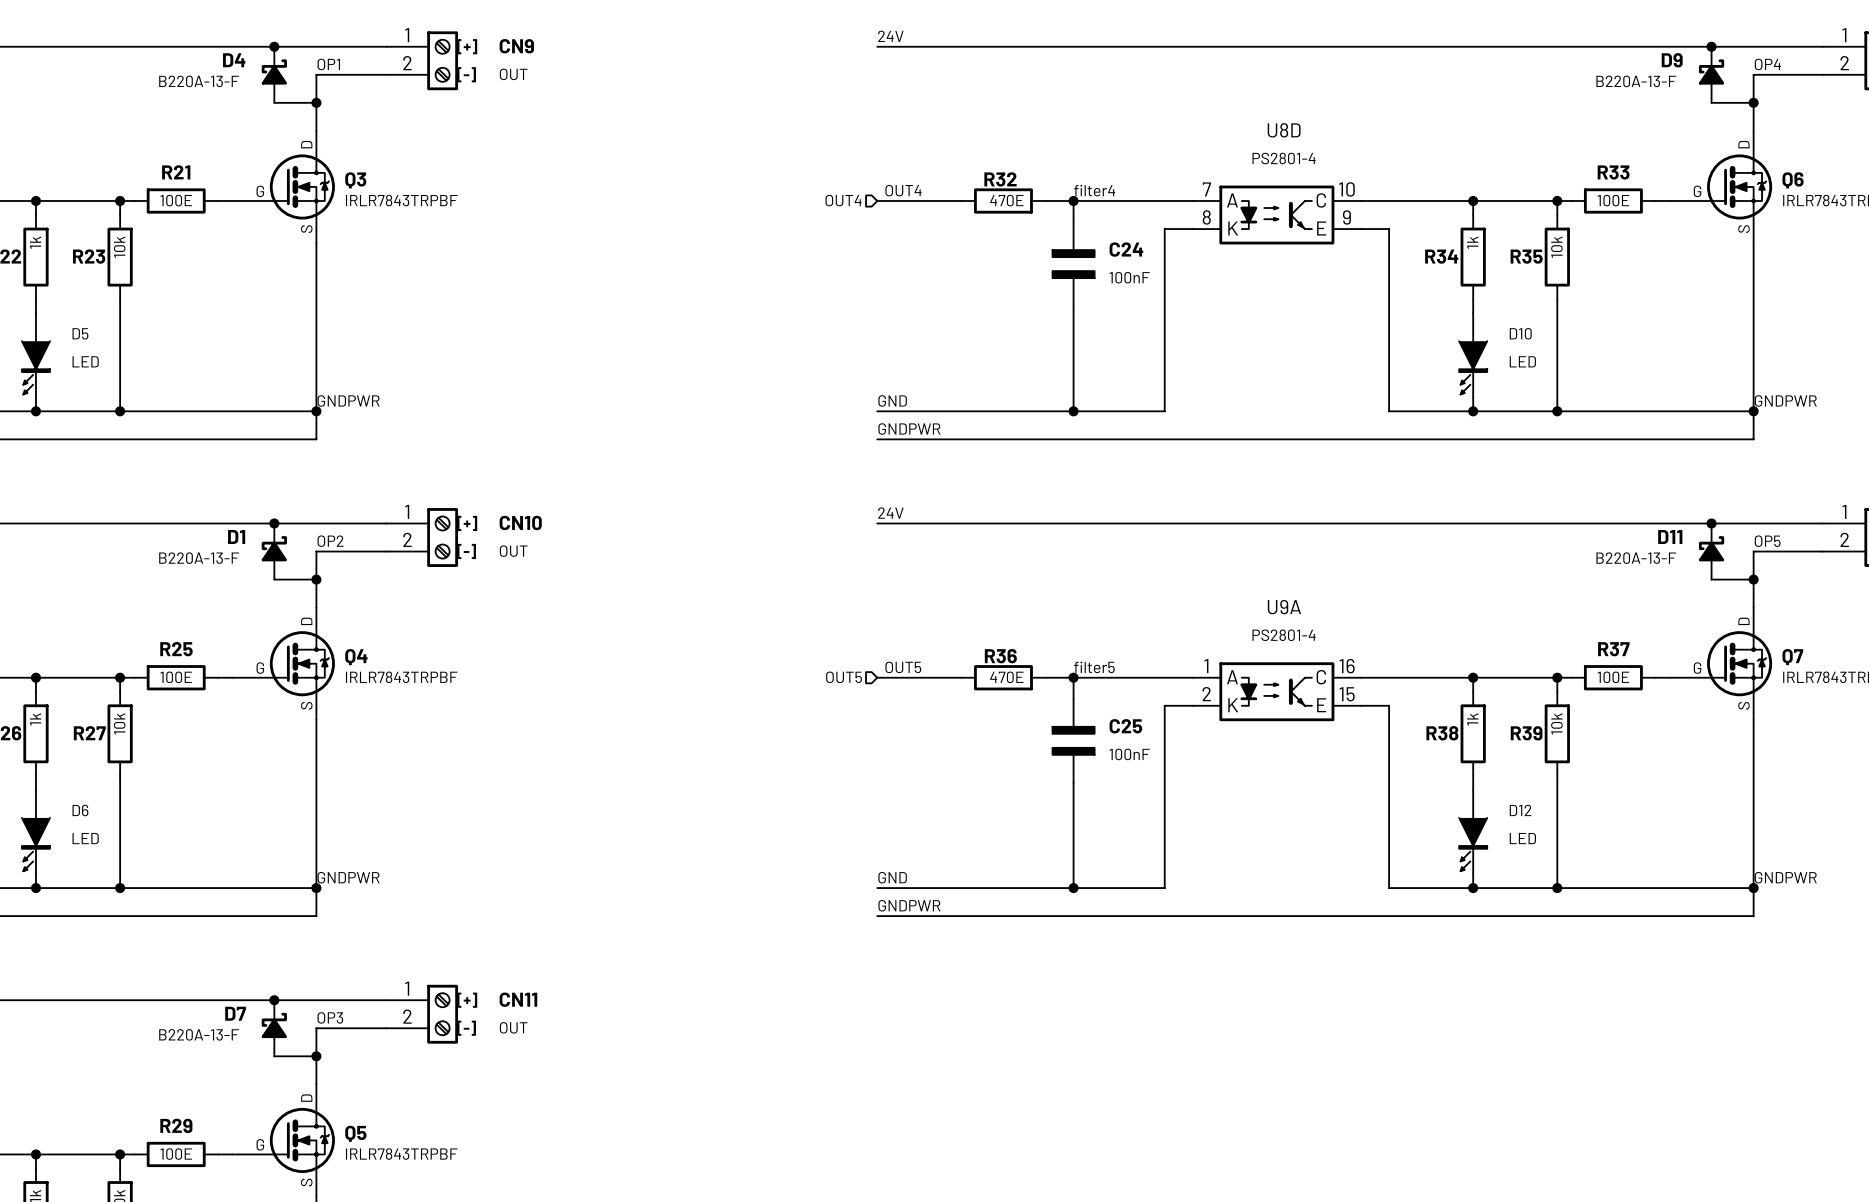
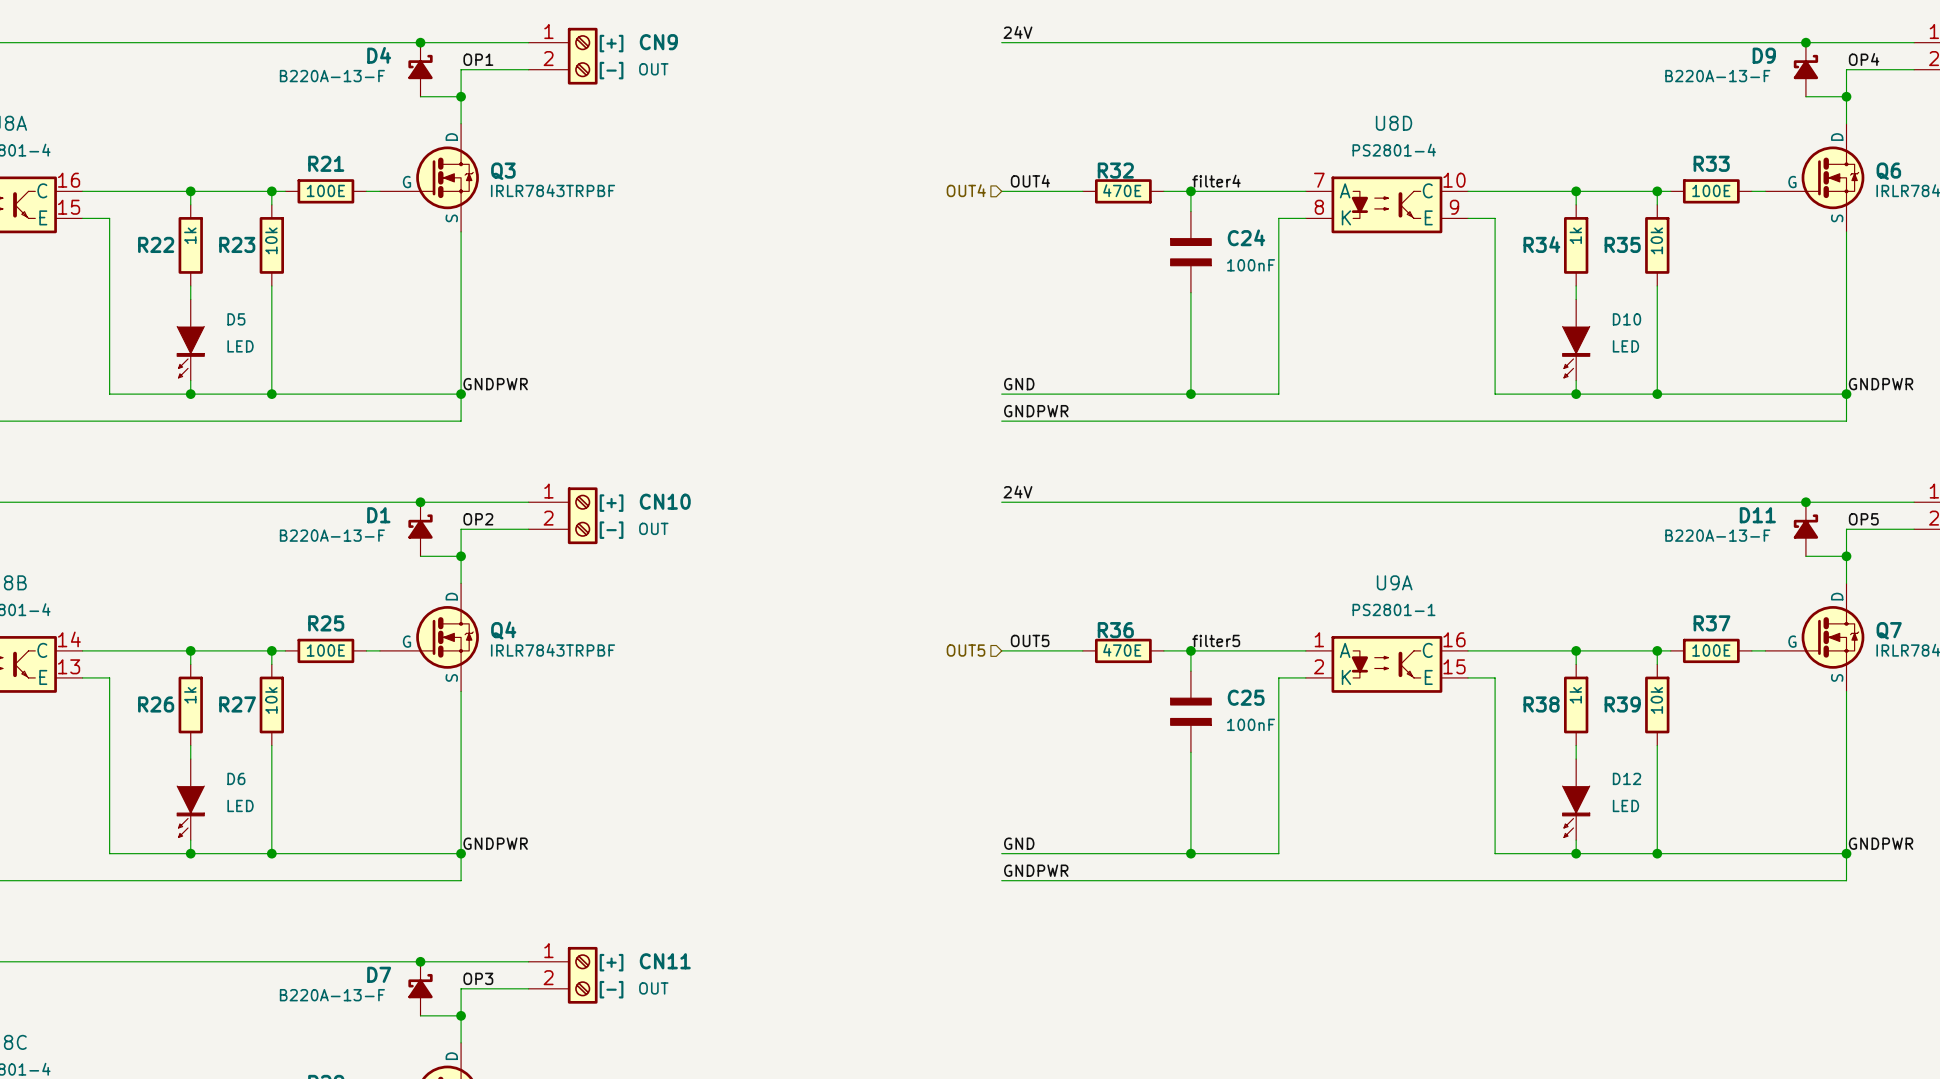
U9A value: PS2801-4 (1284, 635) -> PS2801-1 (1393, 609)

